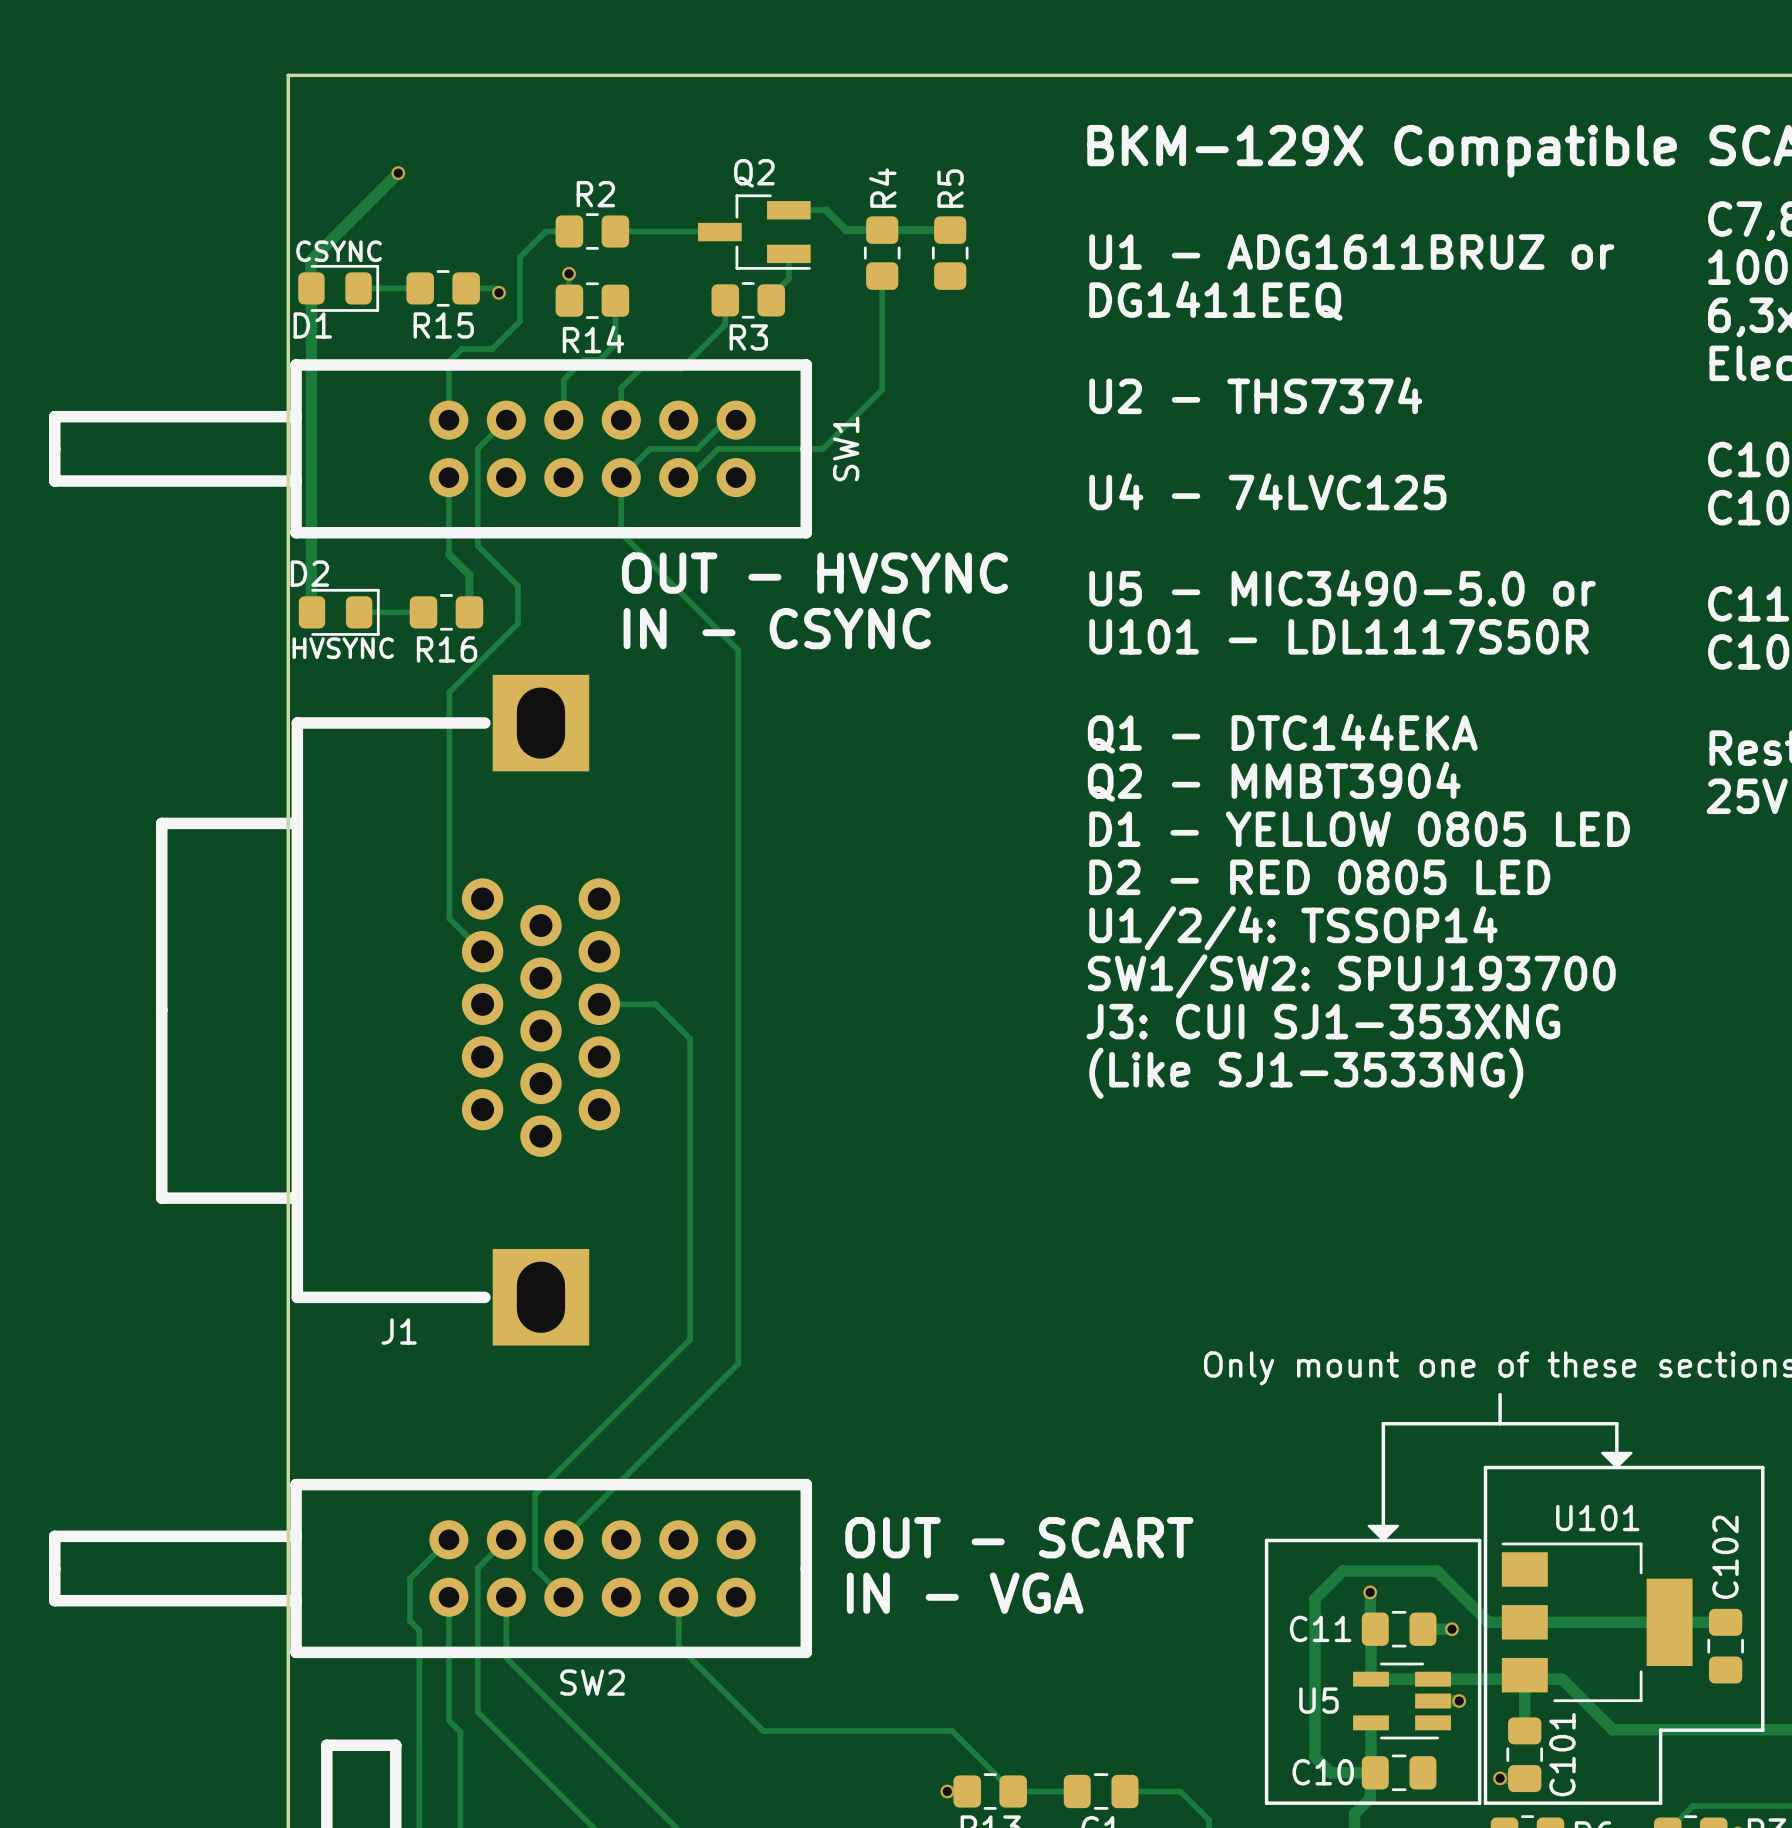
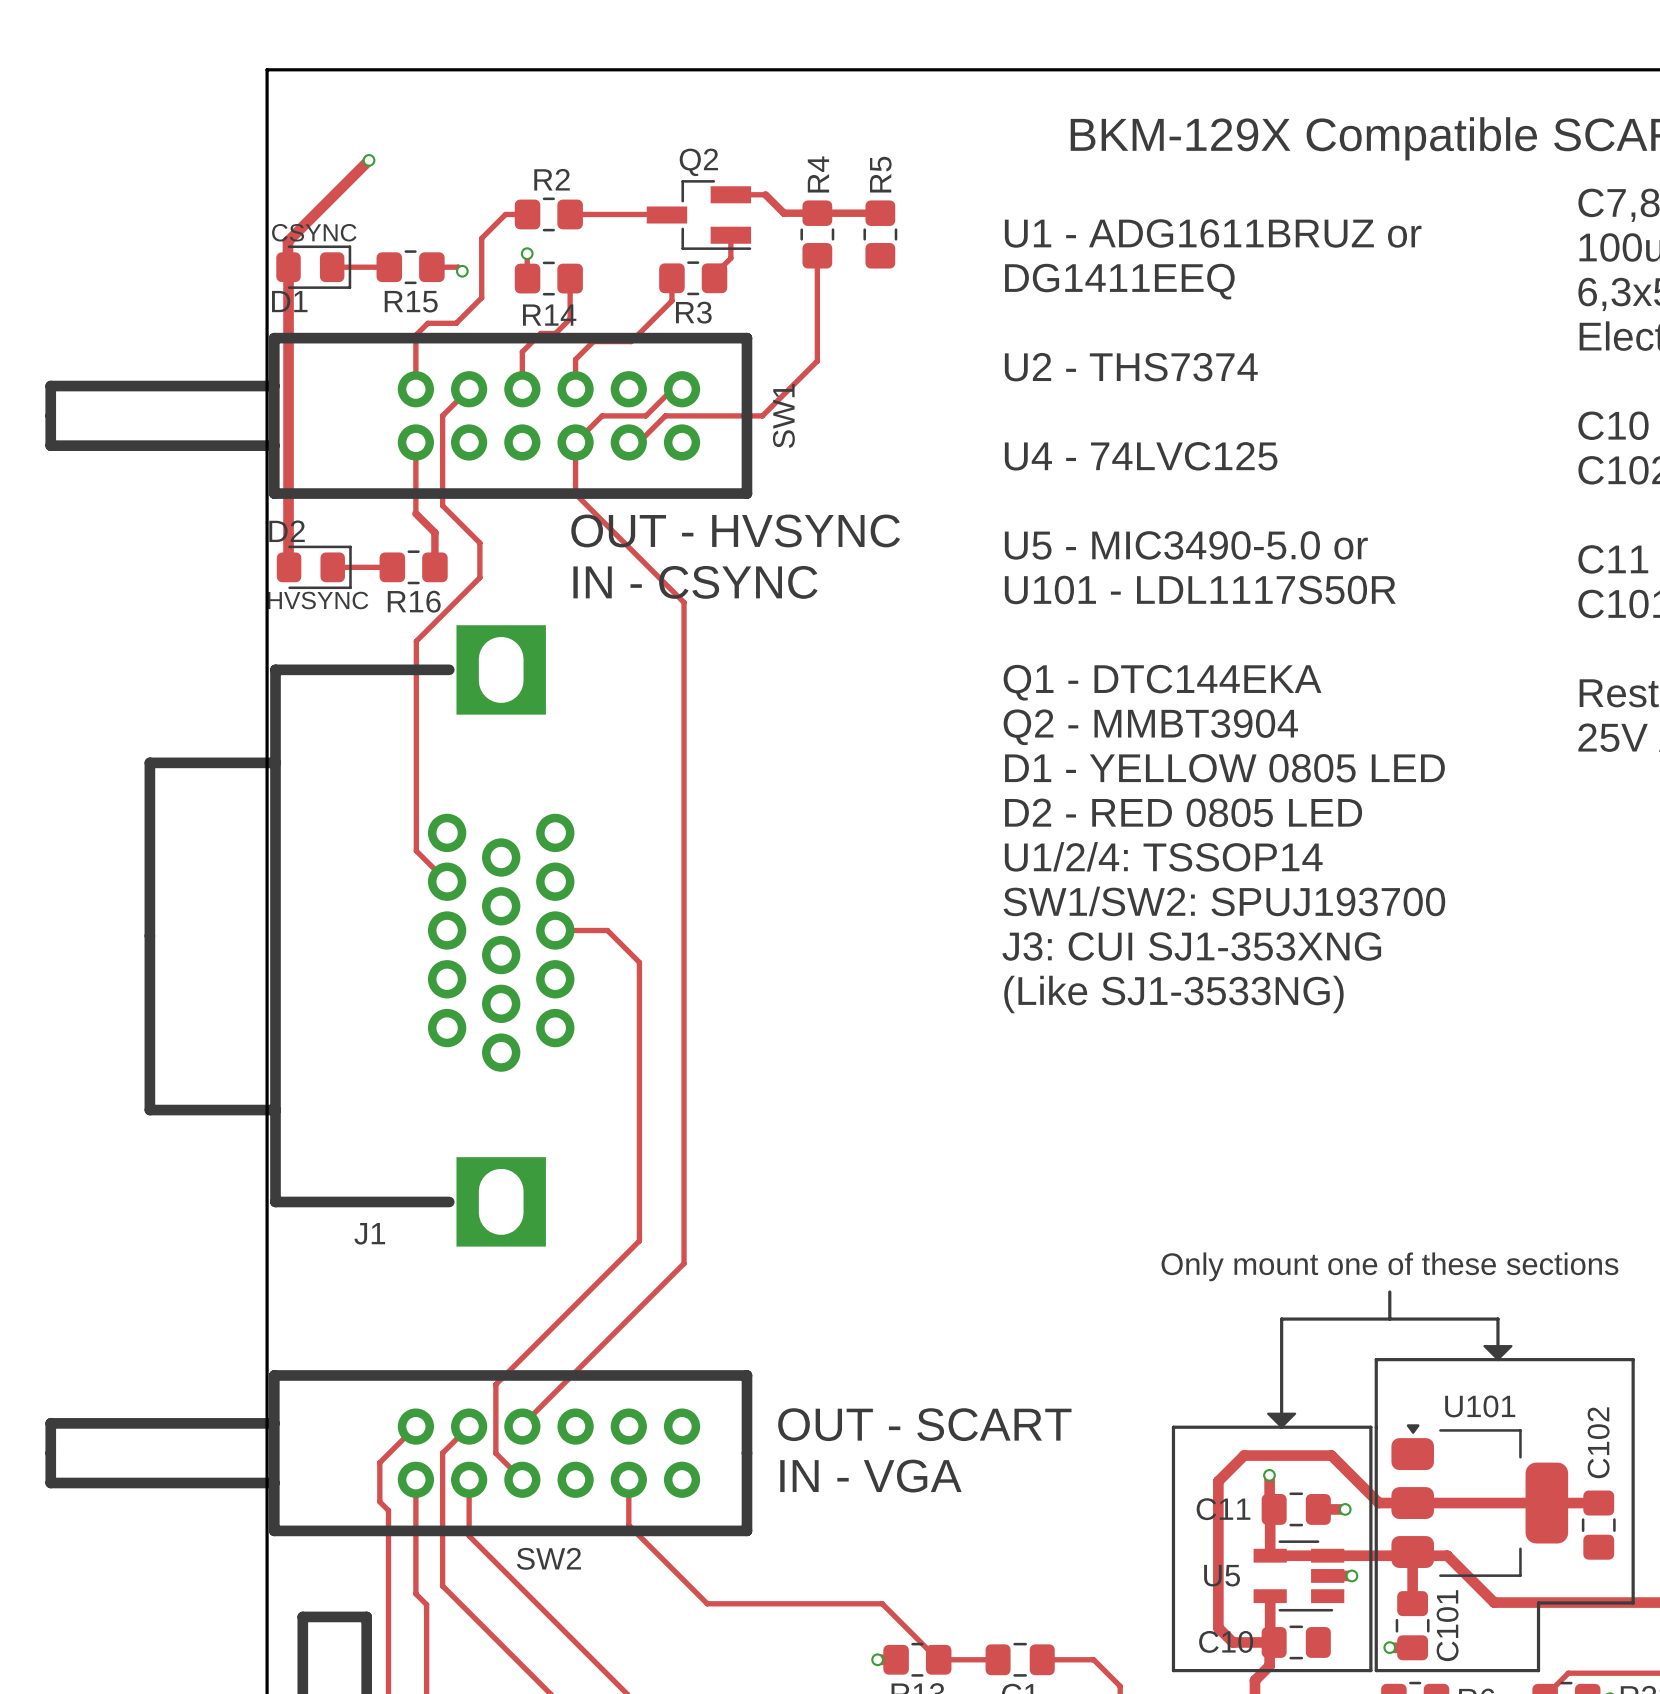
U101 footprint: [1501, 1542, 1693, 1703] -> [1391, 1424, 1569, 1577]

